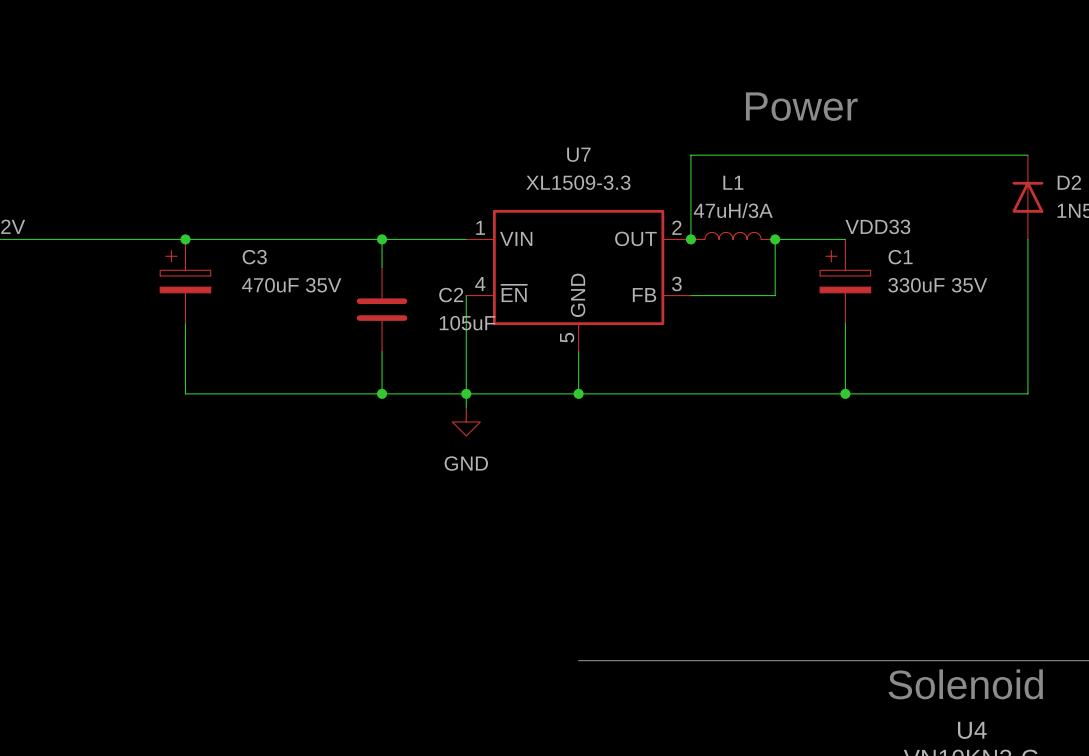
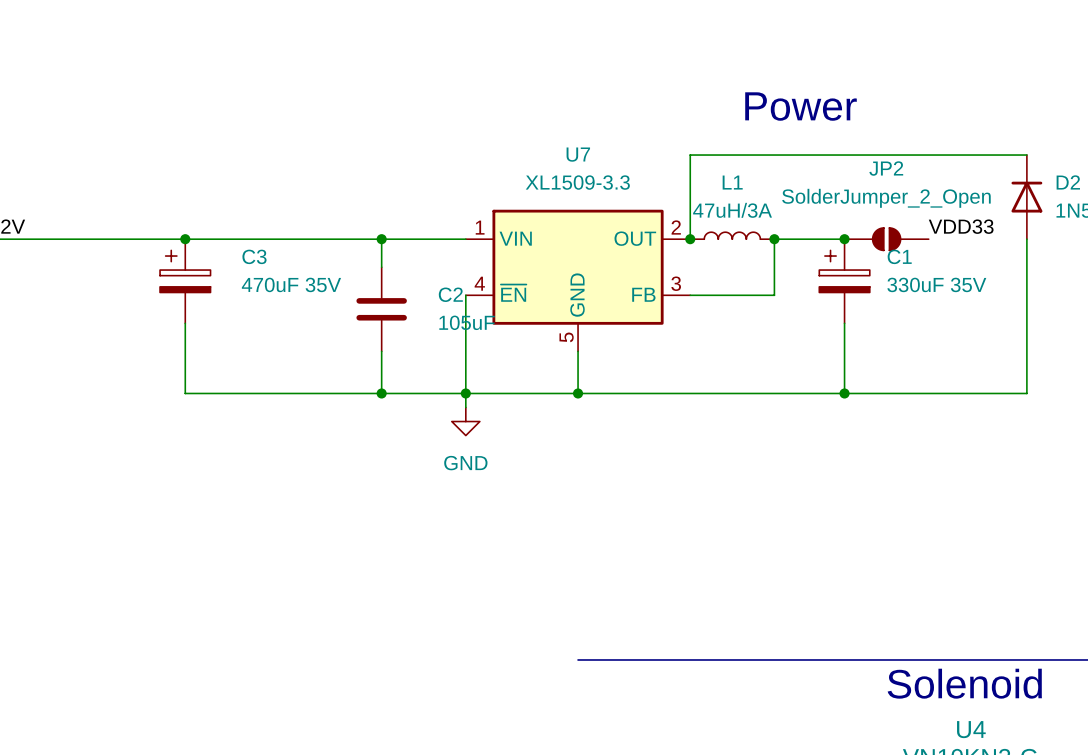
label position: VDD33 (877, 226) -> VDD33 (961, 226)
junction: none -> (844, 239)
JP2: none -> SolderJumper_2_Open (886, 239)

